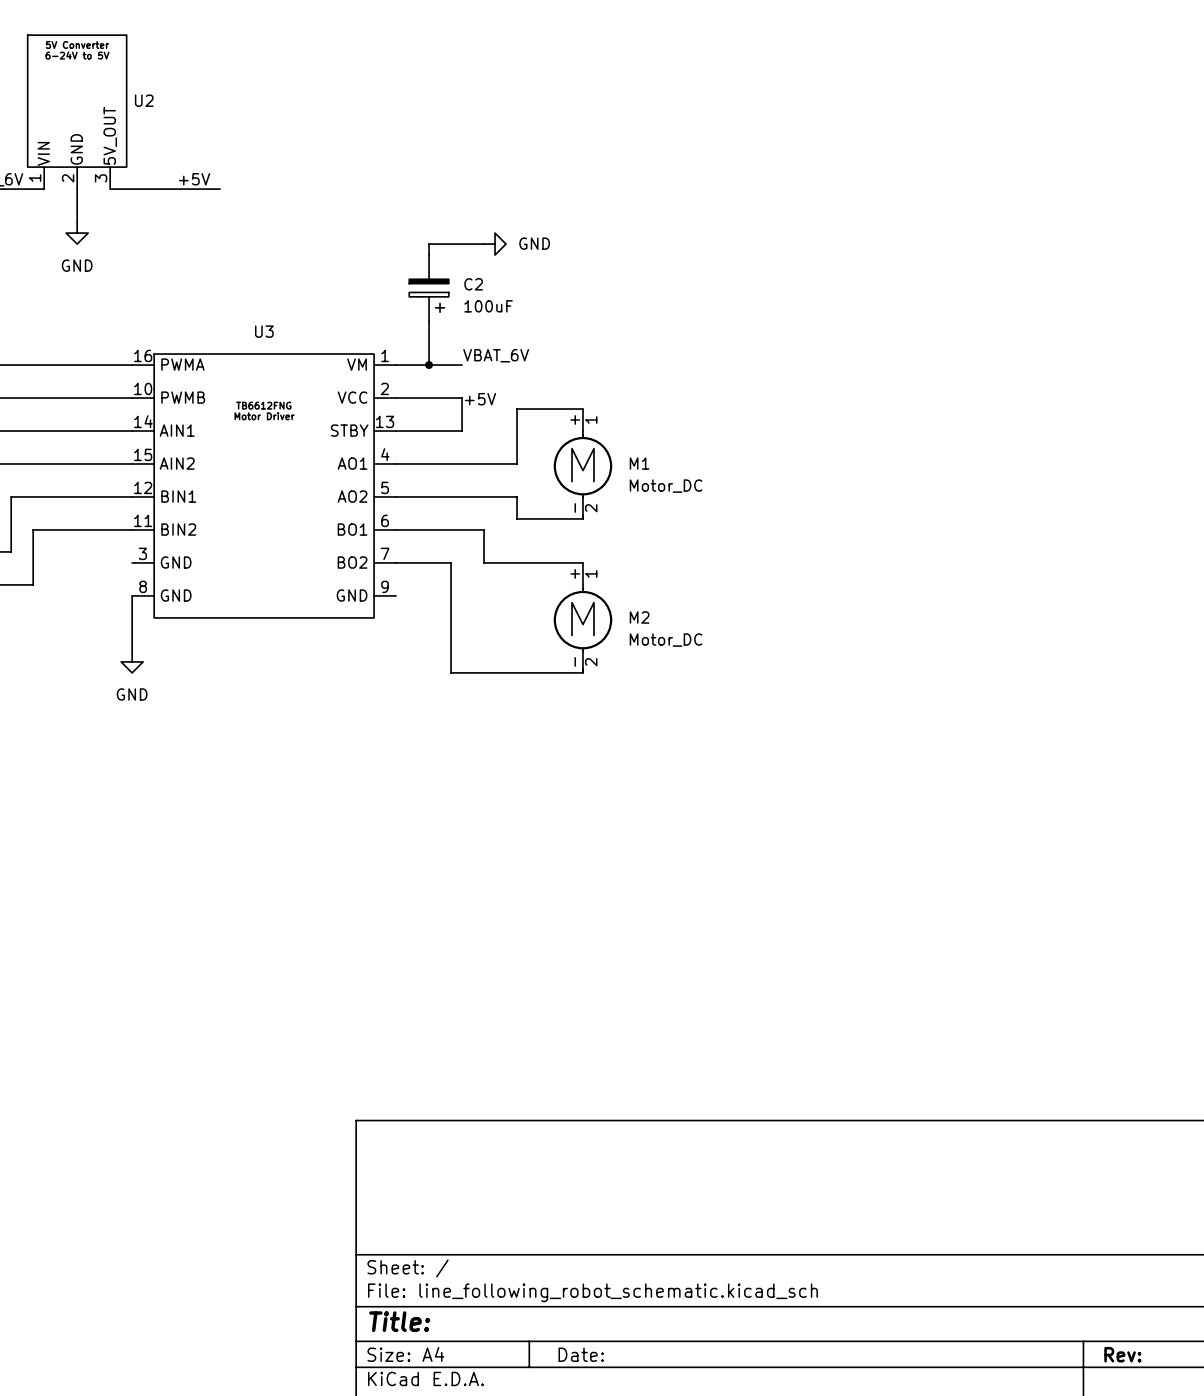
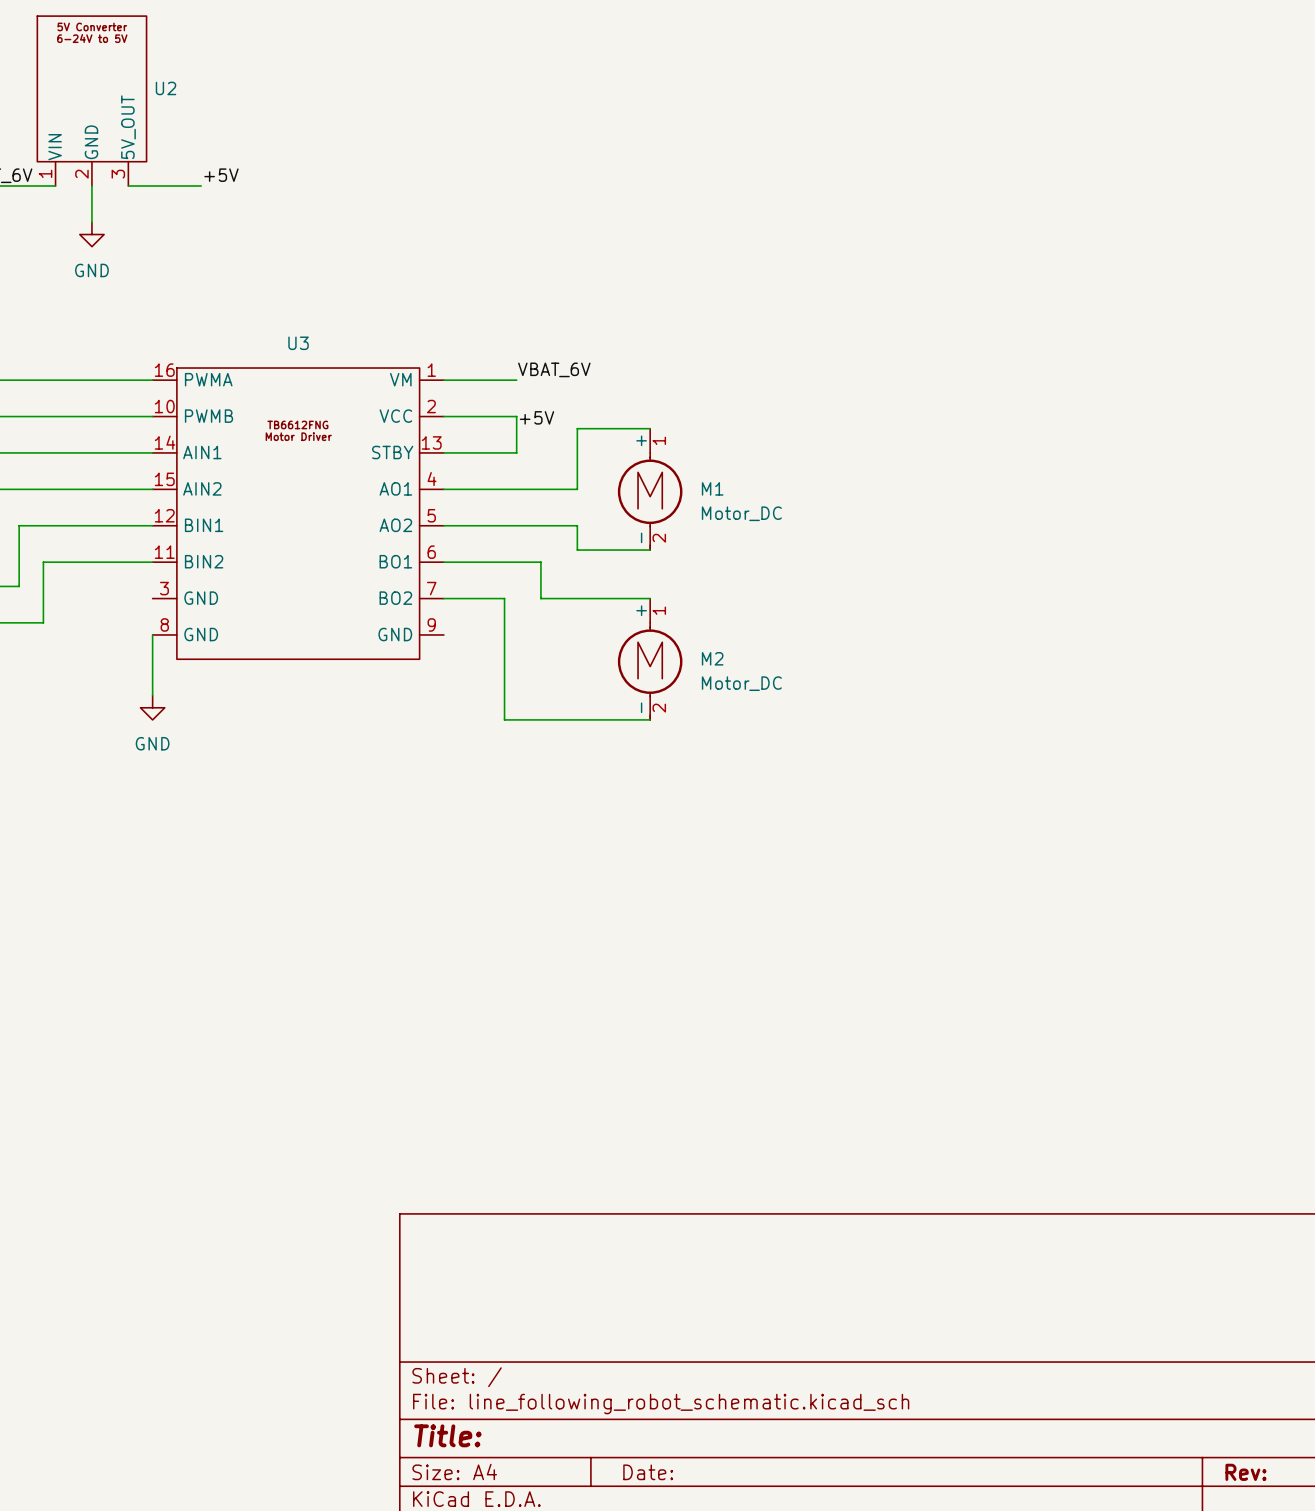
wire: (176, 189) (220, 189) -> none
wire: (484, 244) (429, 244) (429, 255) -> none
power symbol: GND (495, 244) -> none
C2: 100uF (429, 288) -> none
wire: (429, 321) (429, 365) -> none
junction: (429, 365) -> none

